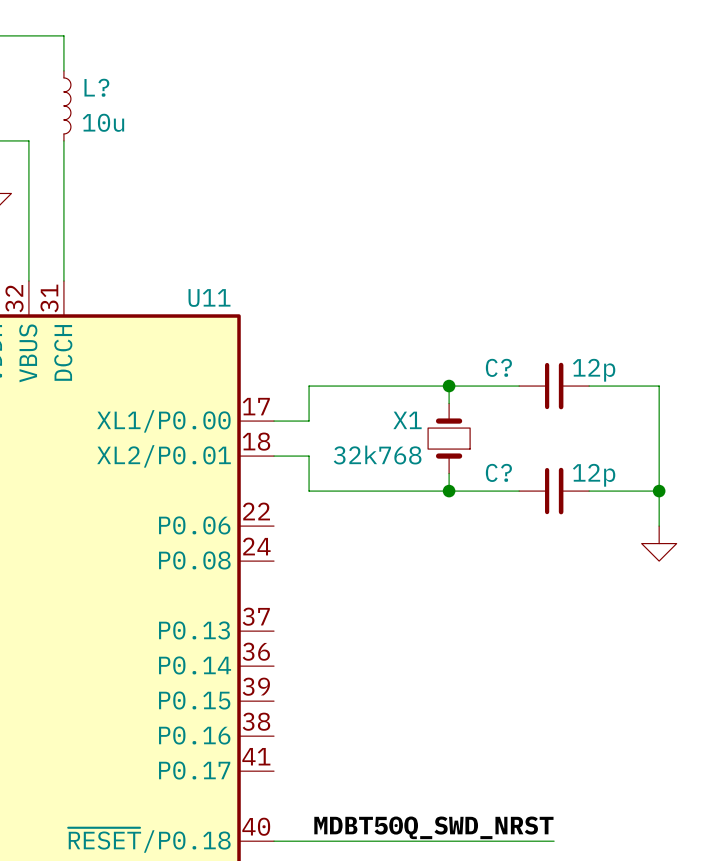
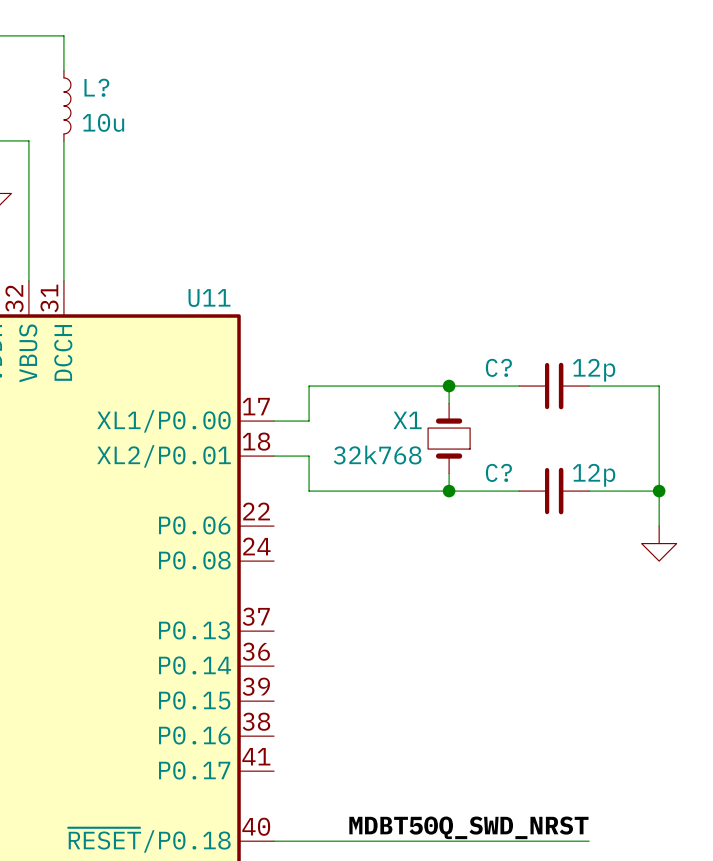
label position: MDBT50Q_SWD_NRST (433, 827) -> MDBT50Q_SWD_NRST (468, 827)
wire: none -> (554, 841) (589, 841)

